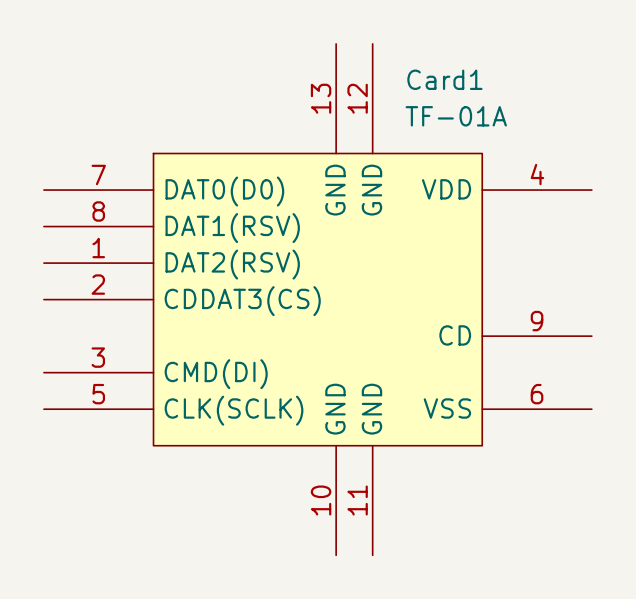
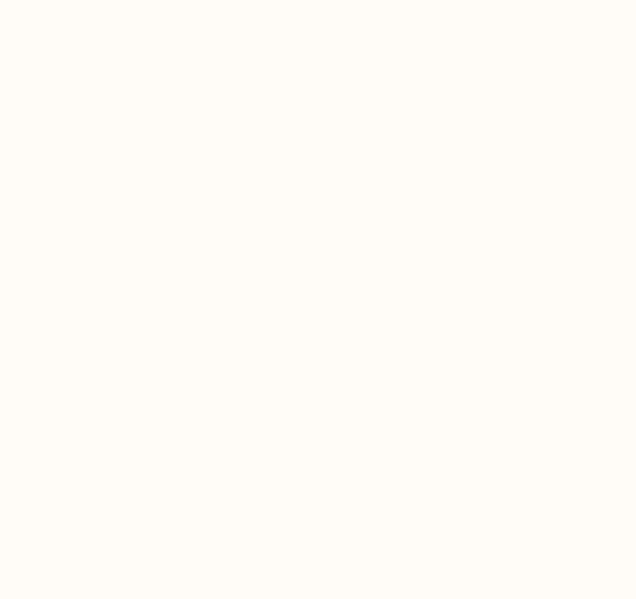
Card1: TF-01A (317, 299) -> none

